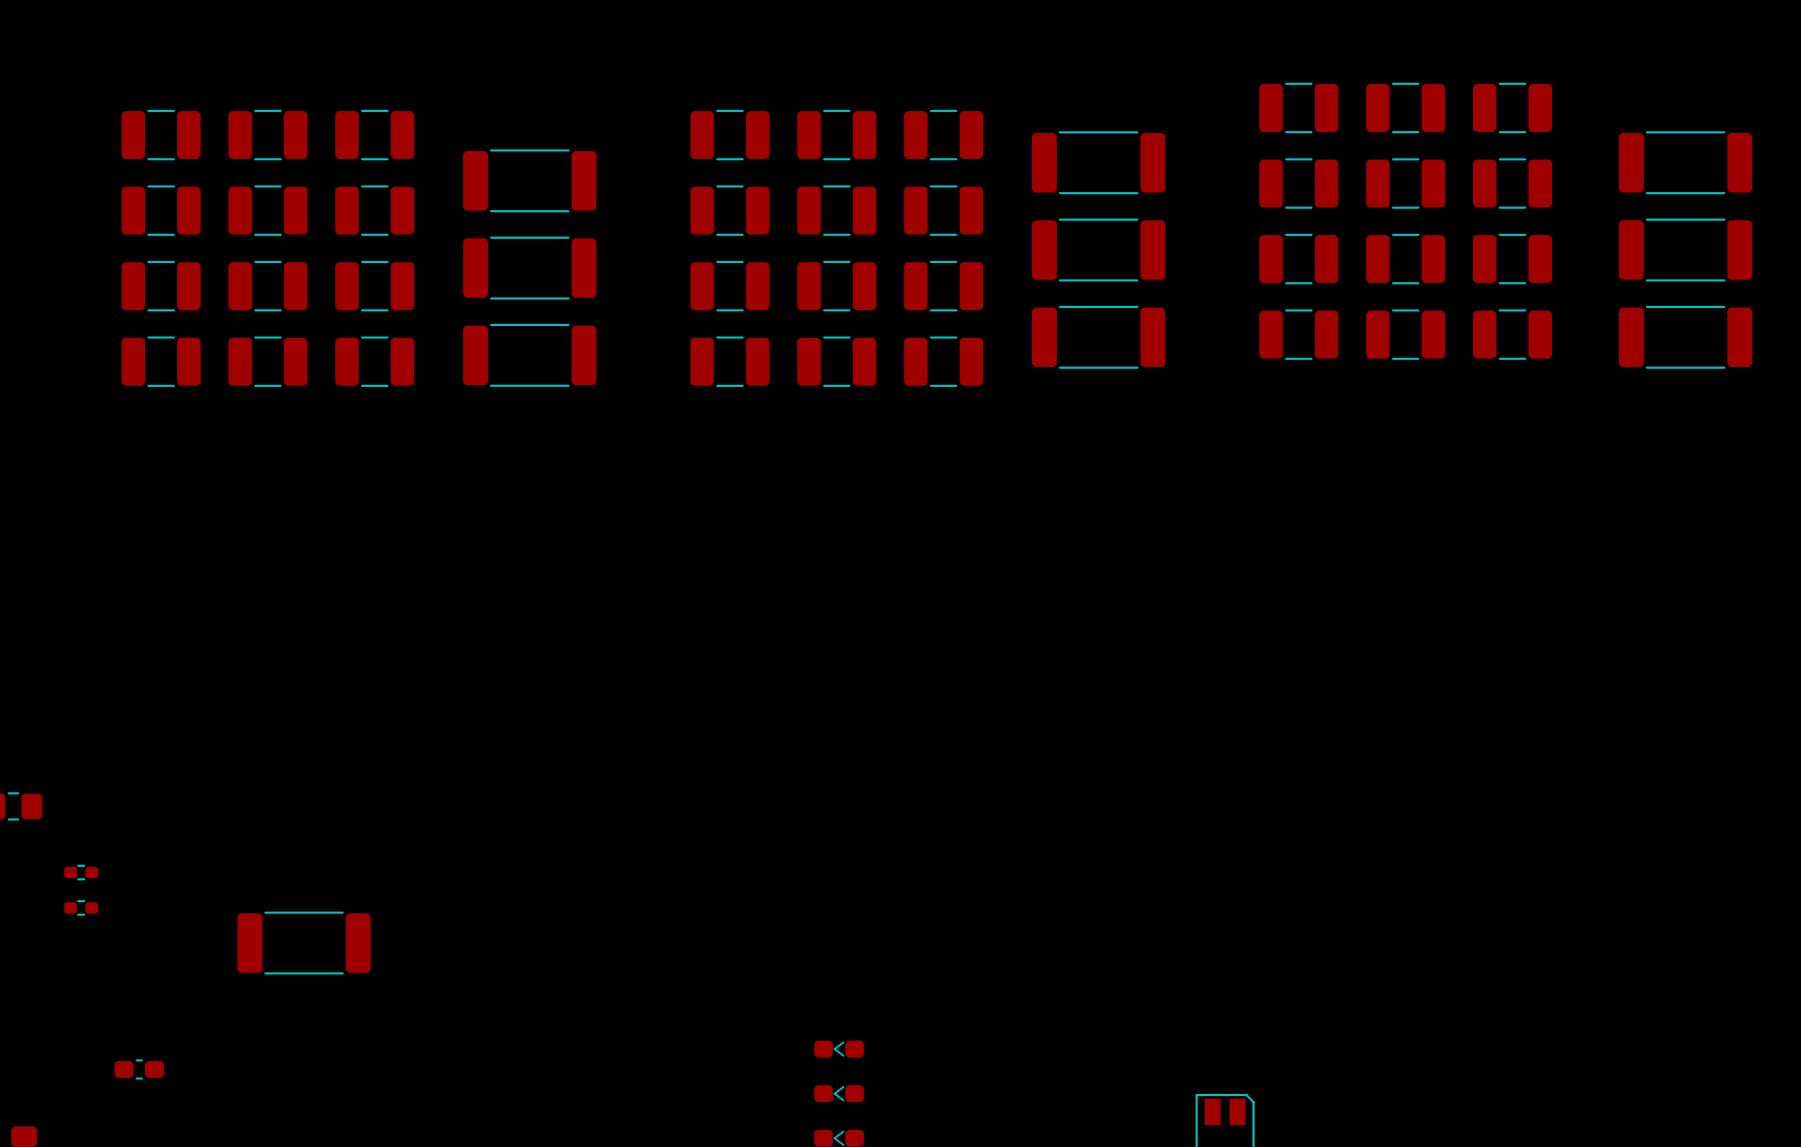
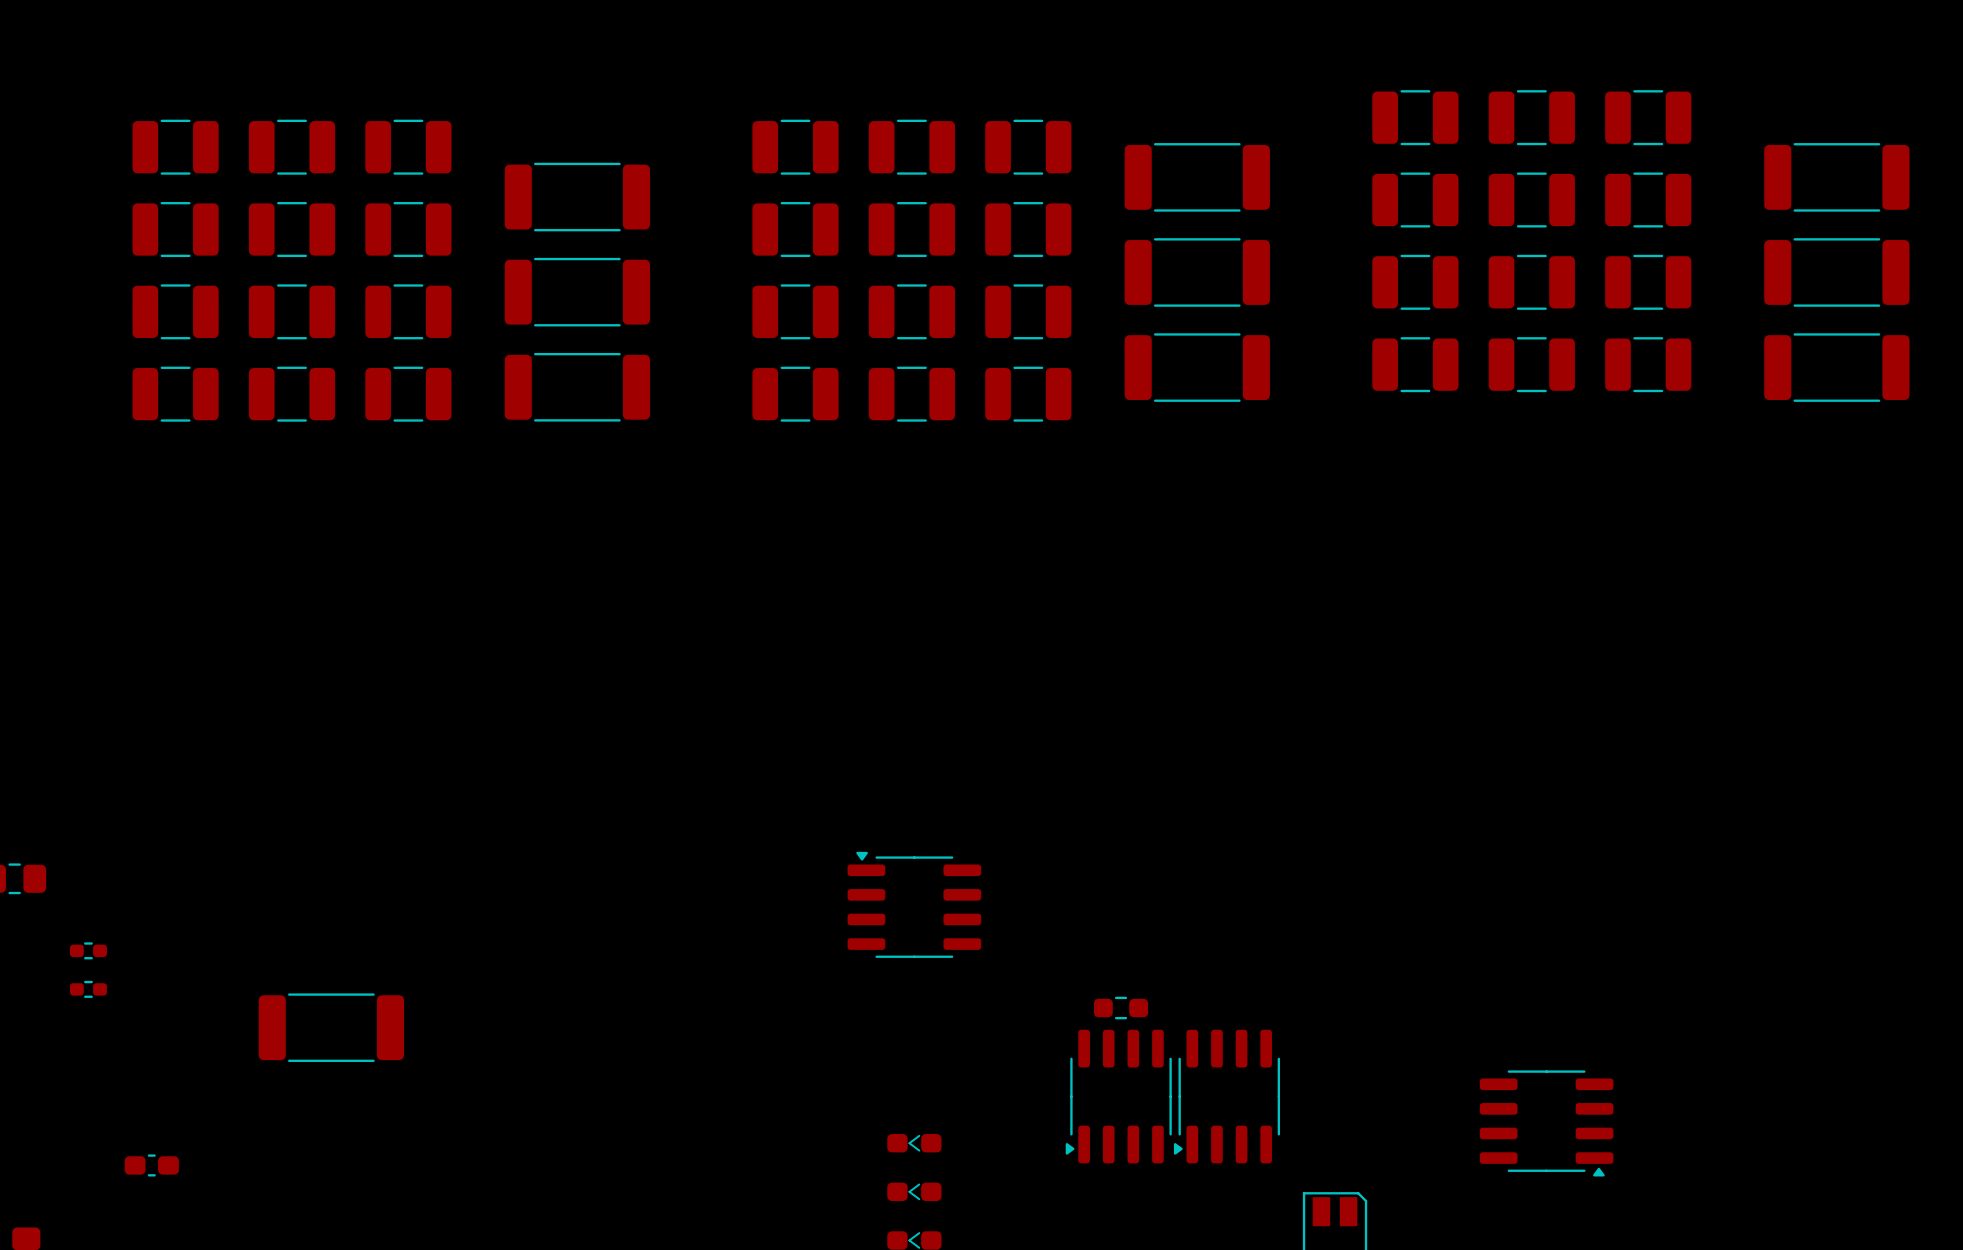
part: none -> (914, 904)
part: none -> (1121, 1008)
part: none -> (1118, 1096)
part: none -> (1226, 1096)
part: none -> (1546, 1123)

